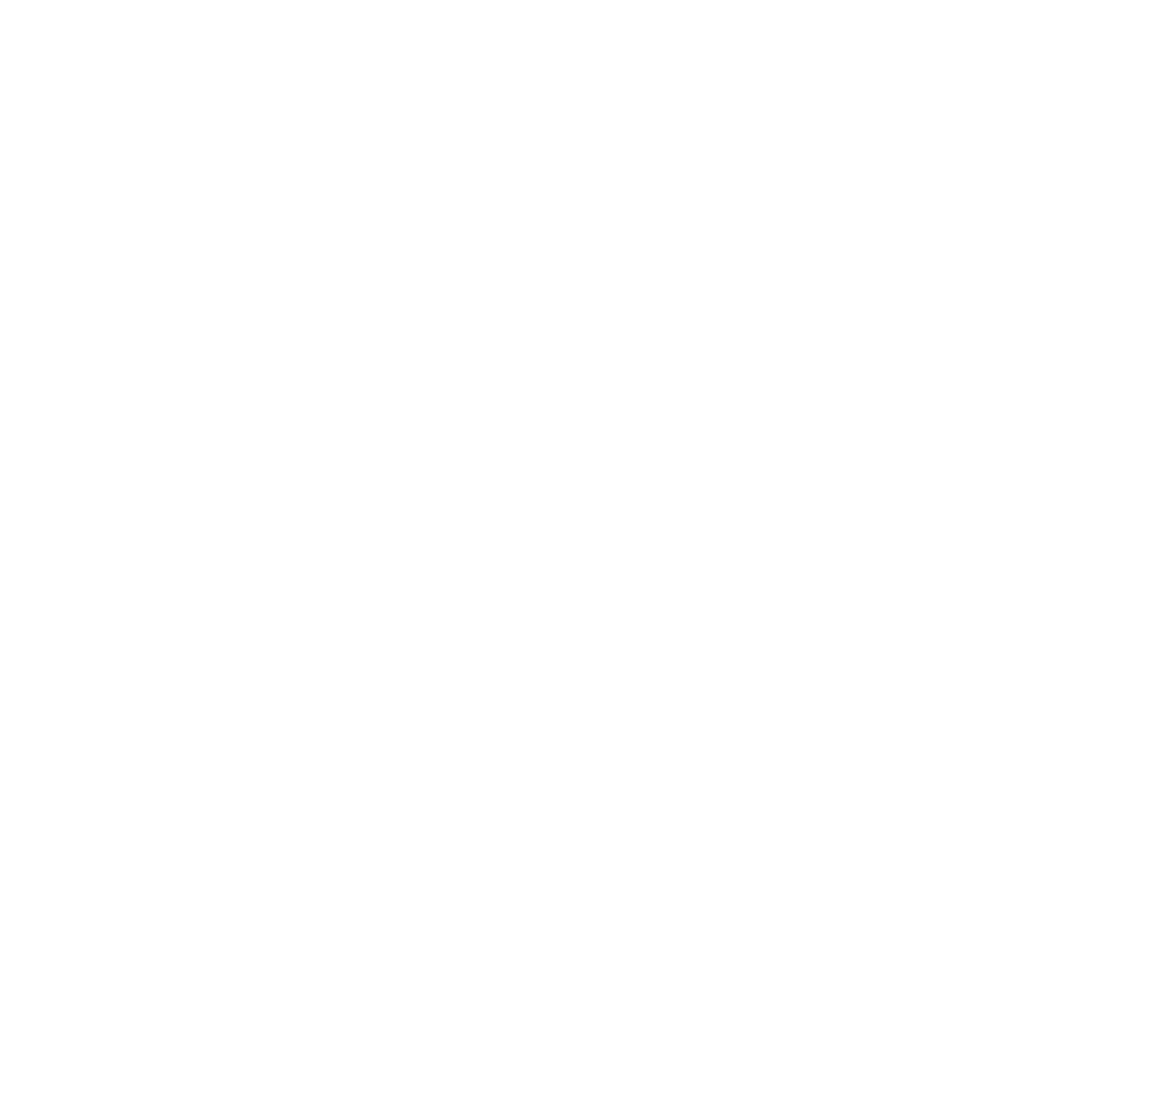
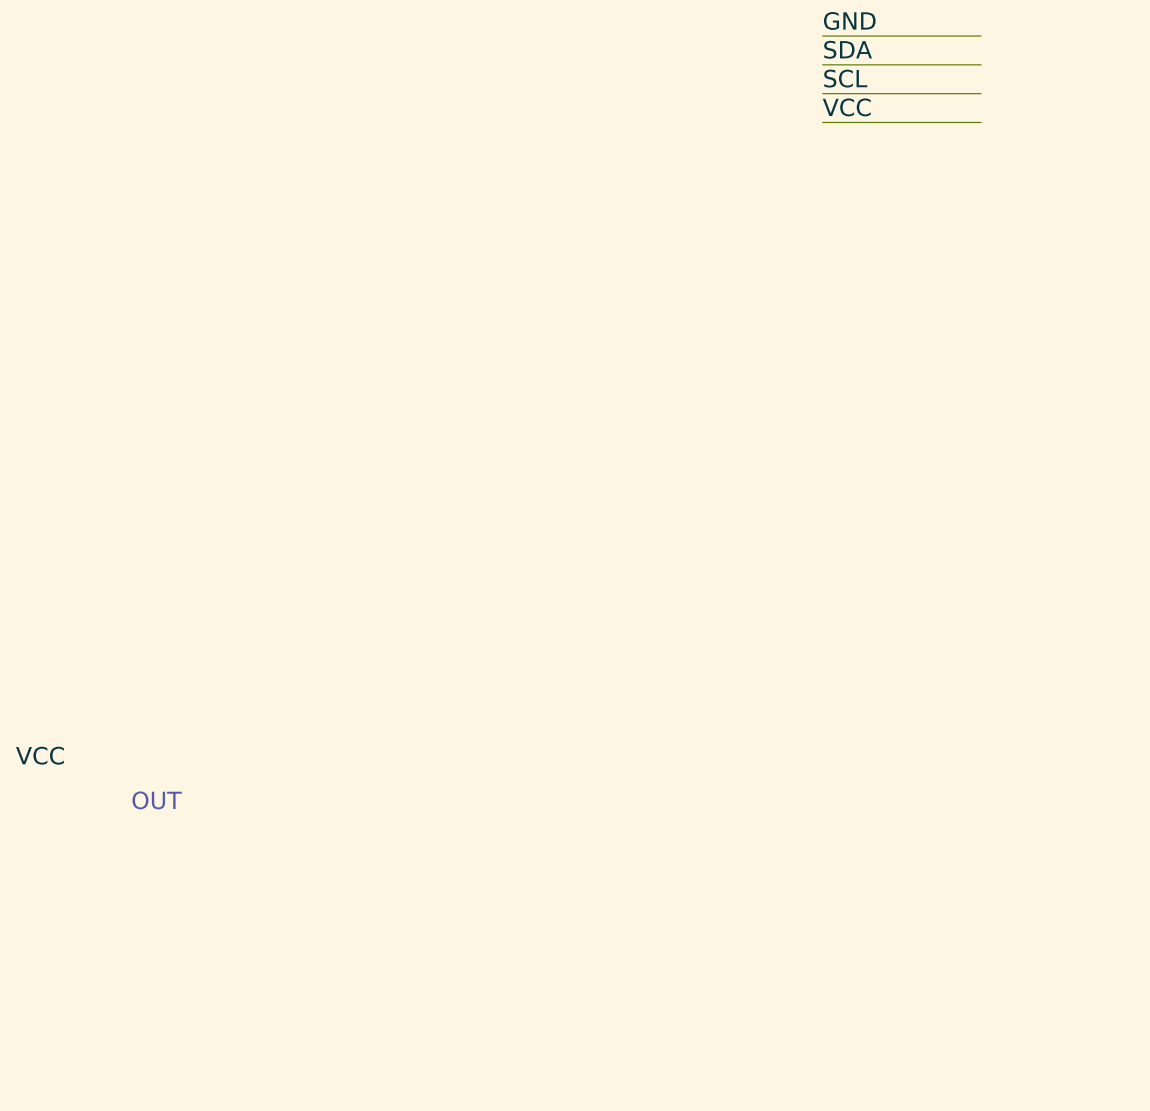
label: none -> GND (849, 20)
wire: none -> (822, 36) (981, 36)
label: none -> SDA (848, 49)
wire: none -> (822, 64) (981, 64)
label: none -> SCL (845, 78)
wire: none -> (822, 93) (981, 93)
label: none -> VCC (846, 107)
wire: none -> (822, 122) (981, 122)
label: none -> VCC (39, 755)
text: none -> OUT (157, 800)

